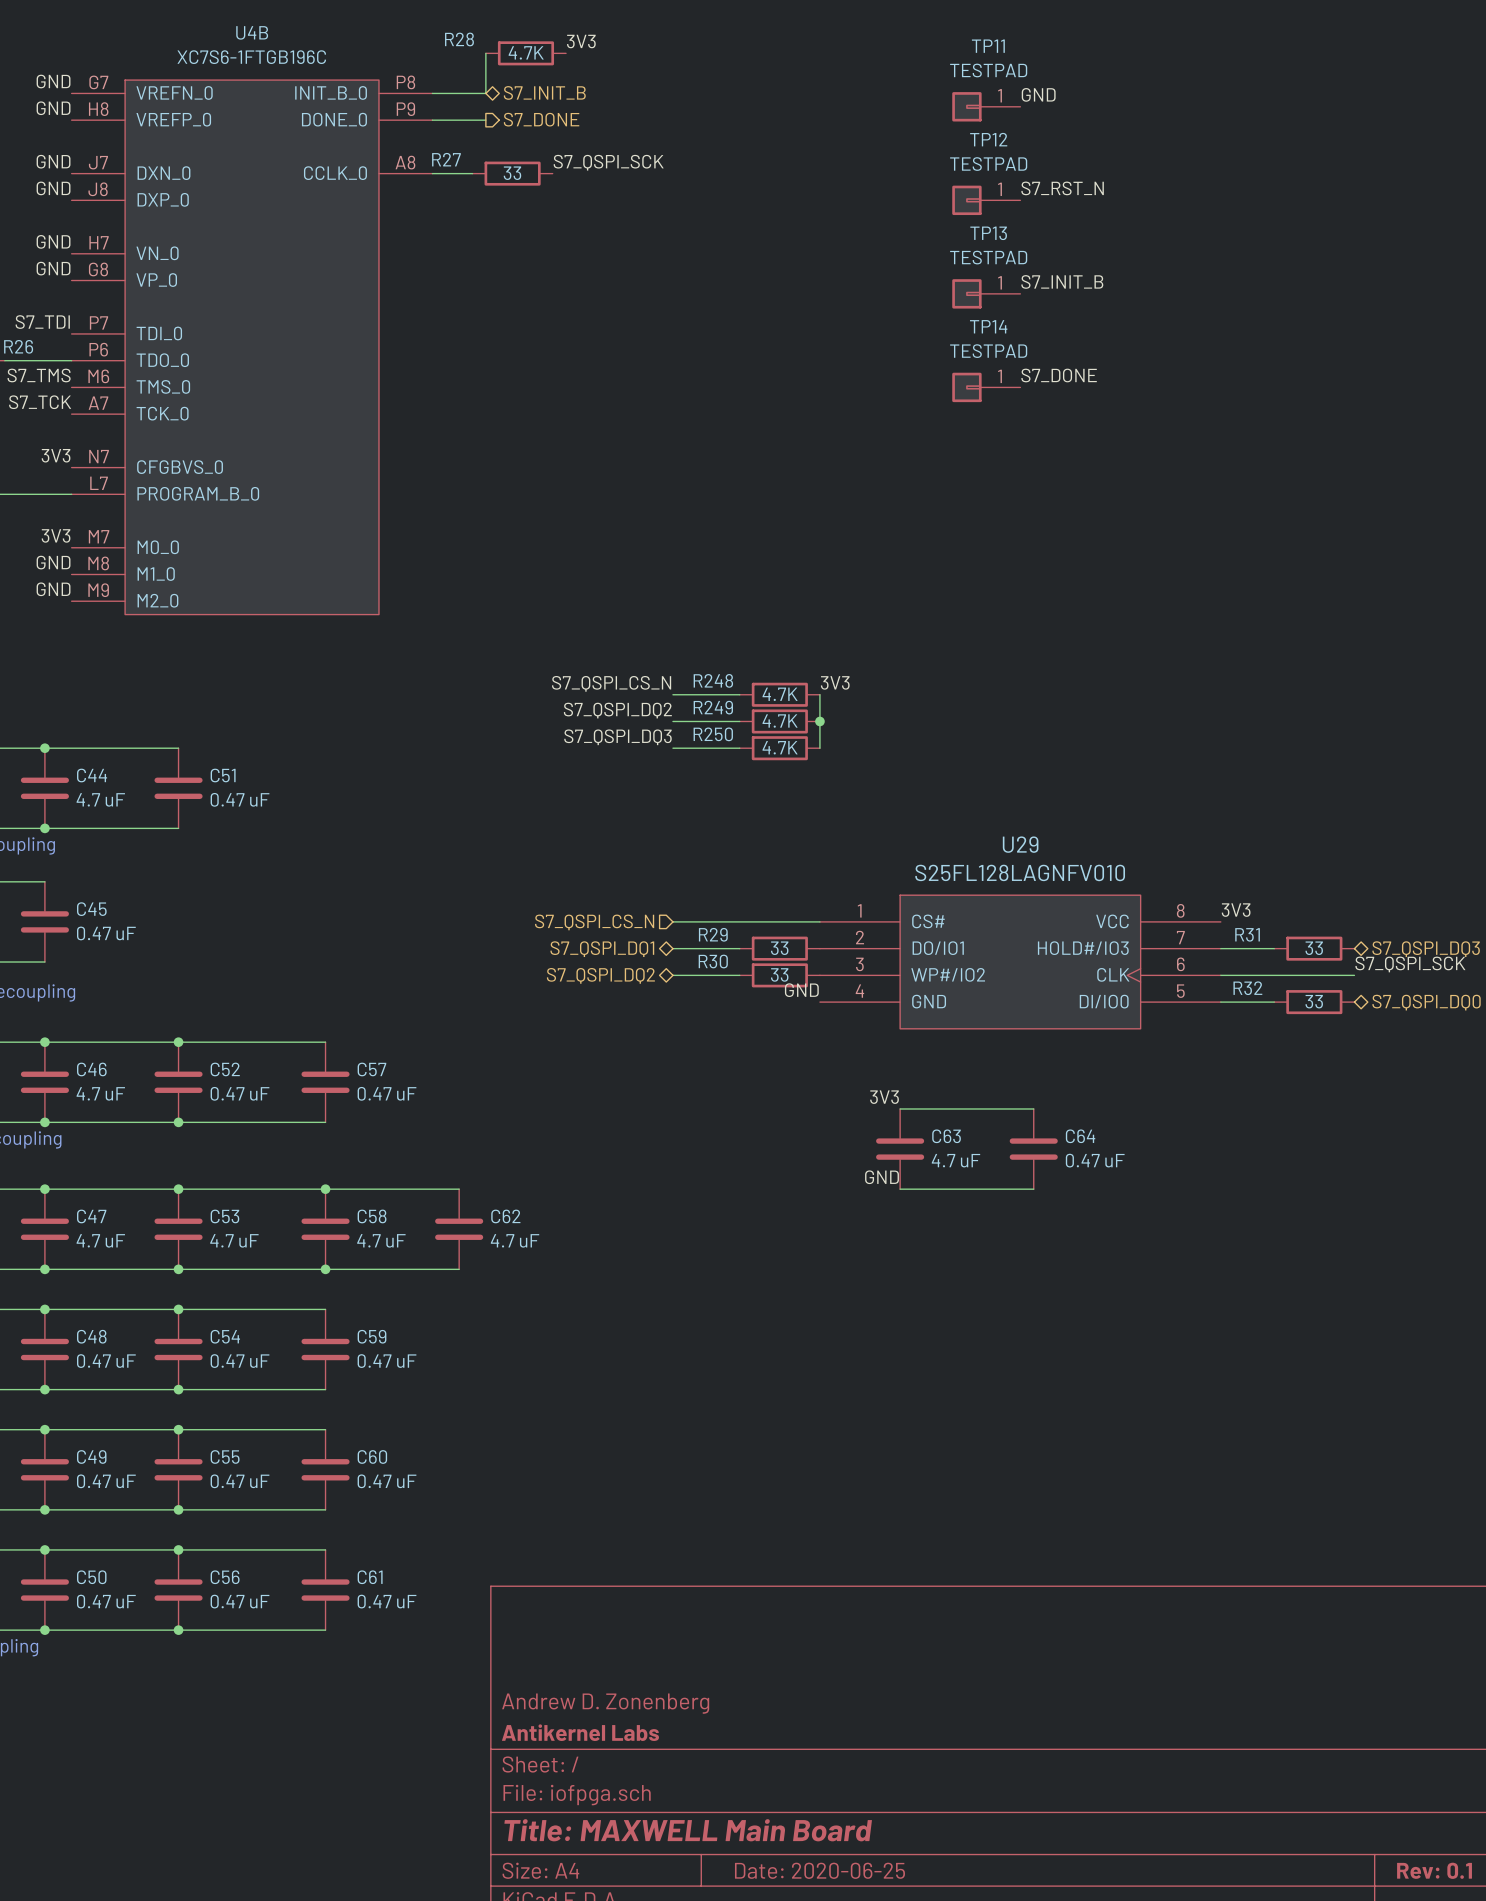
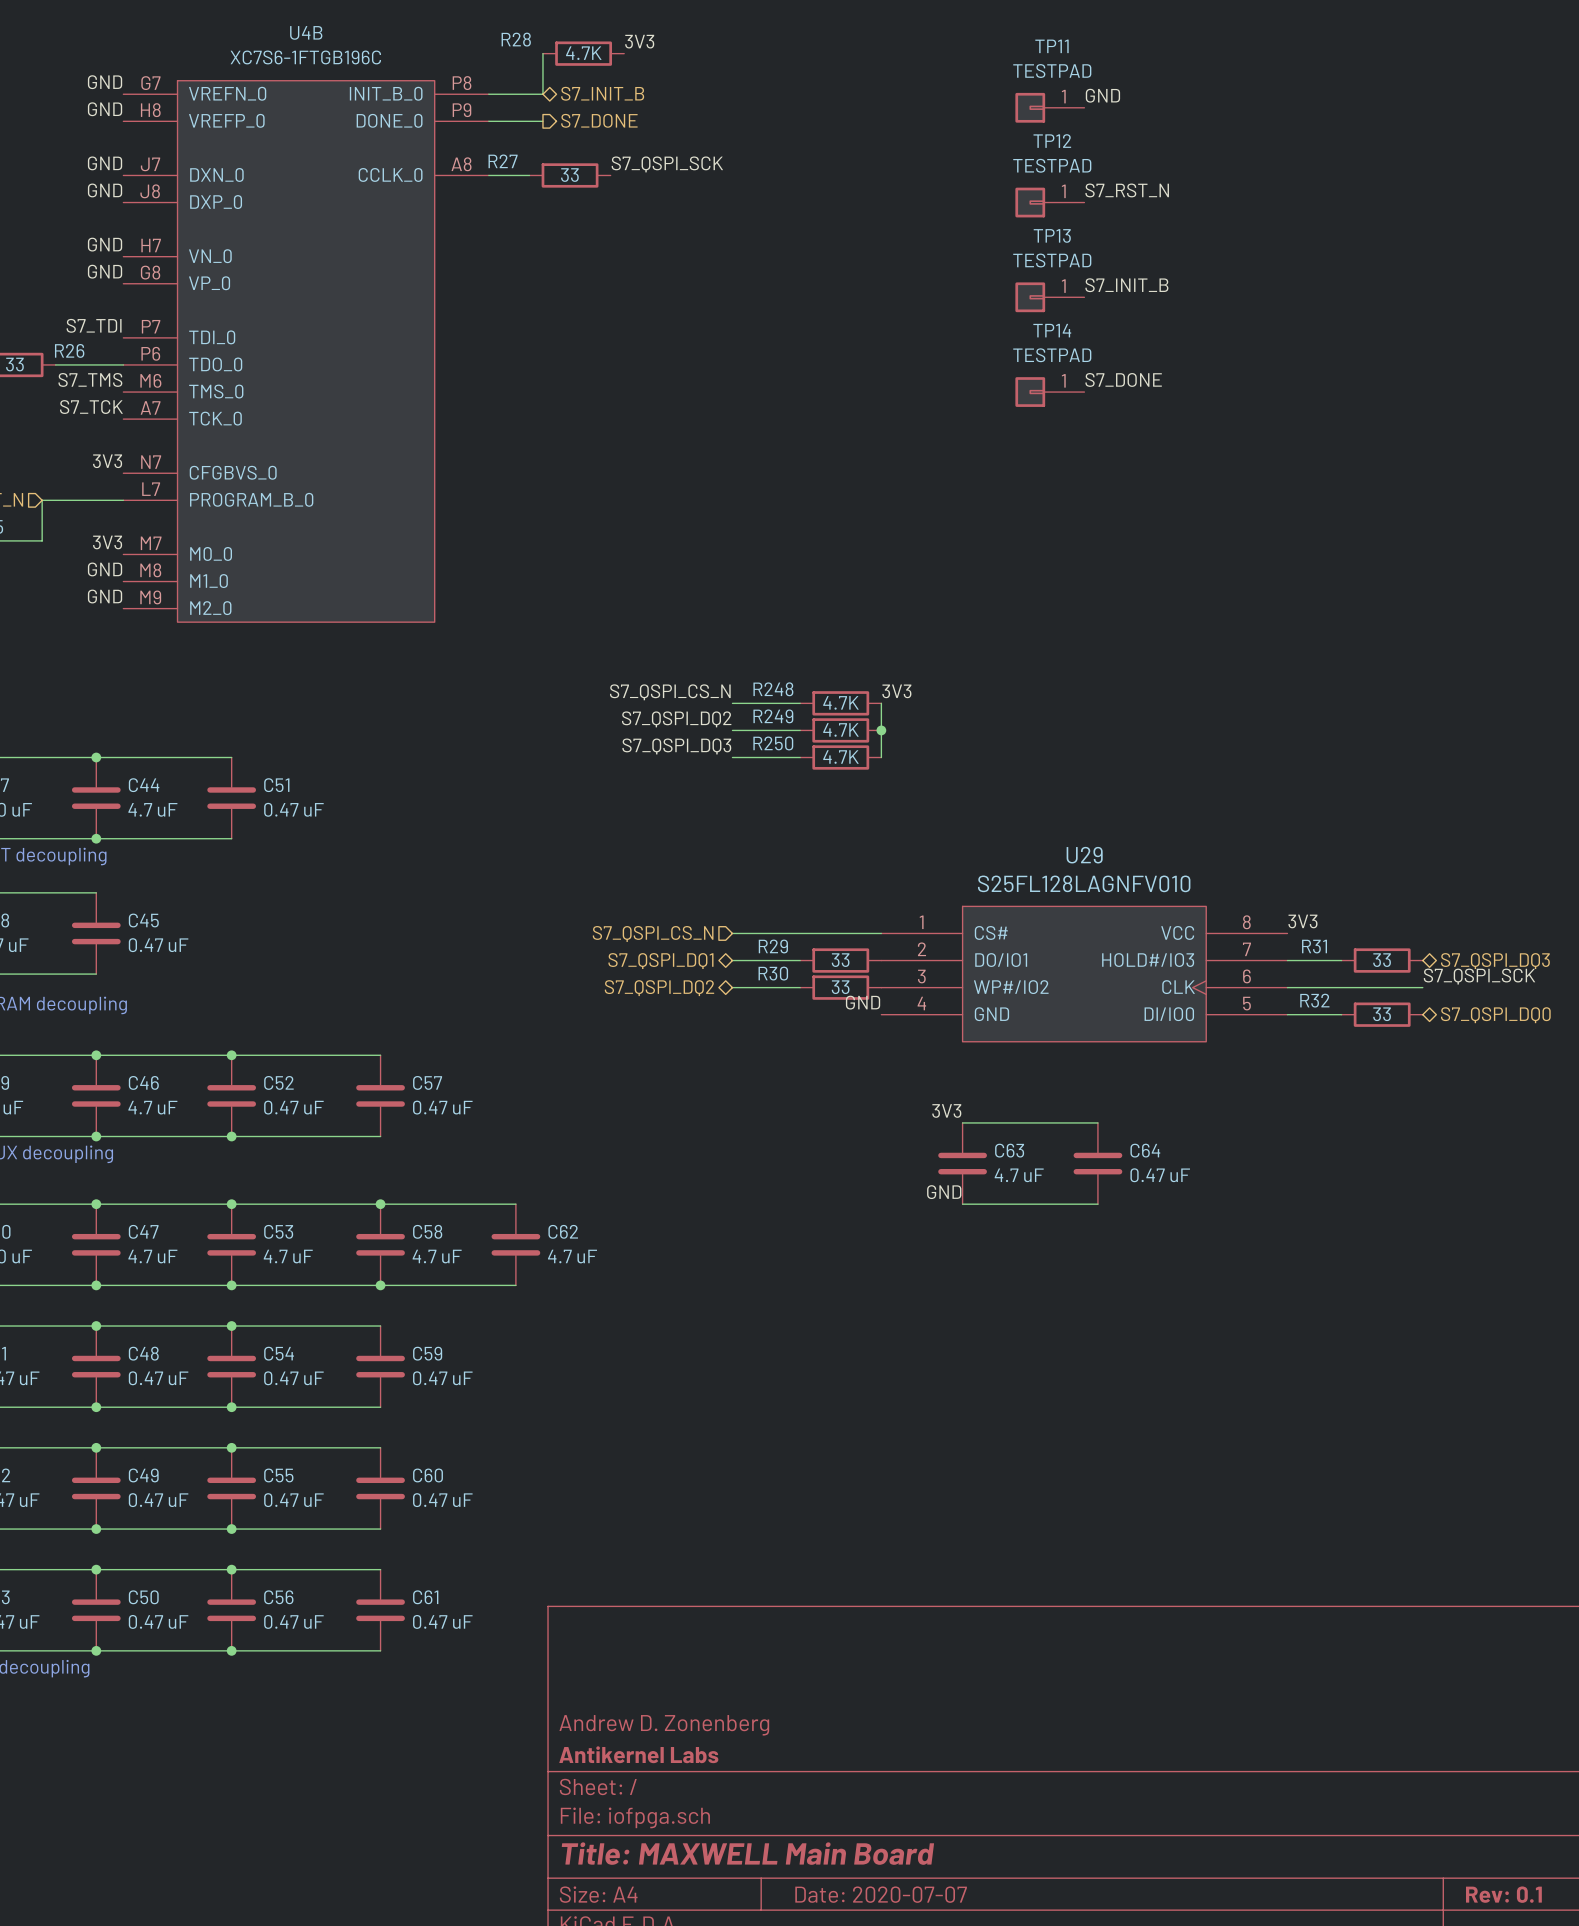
title block: Date: 2020-06-25 (819, 1870) -> Date: 2020-07-07 (881, 1894)

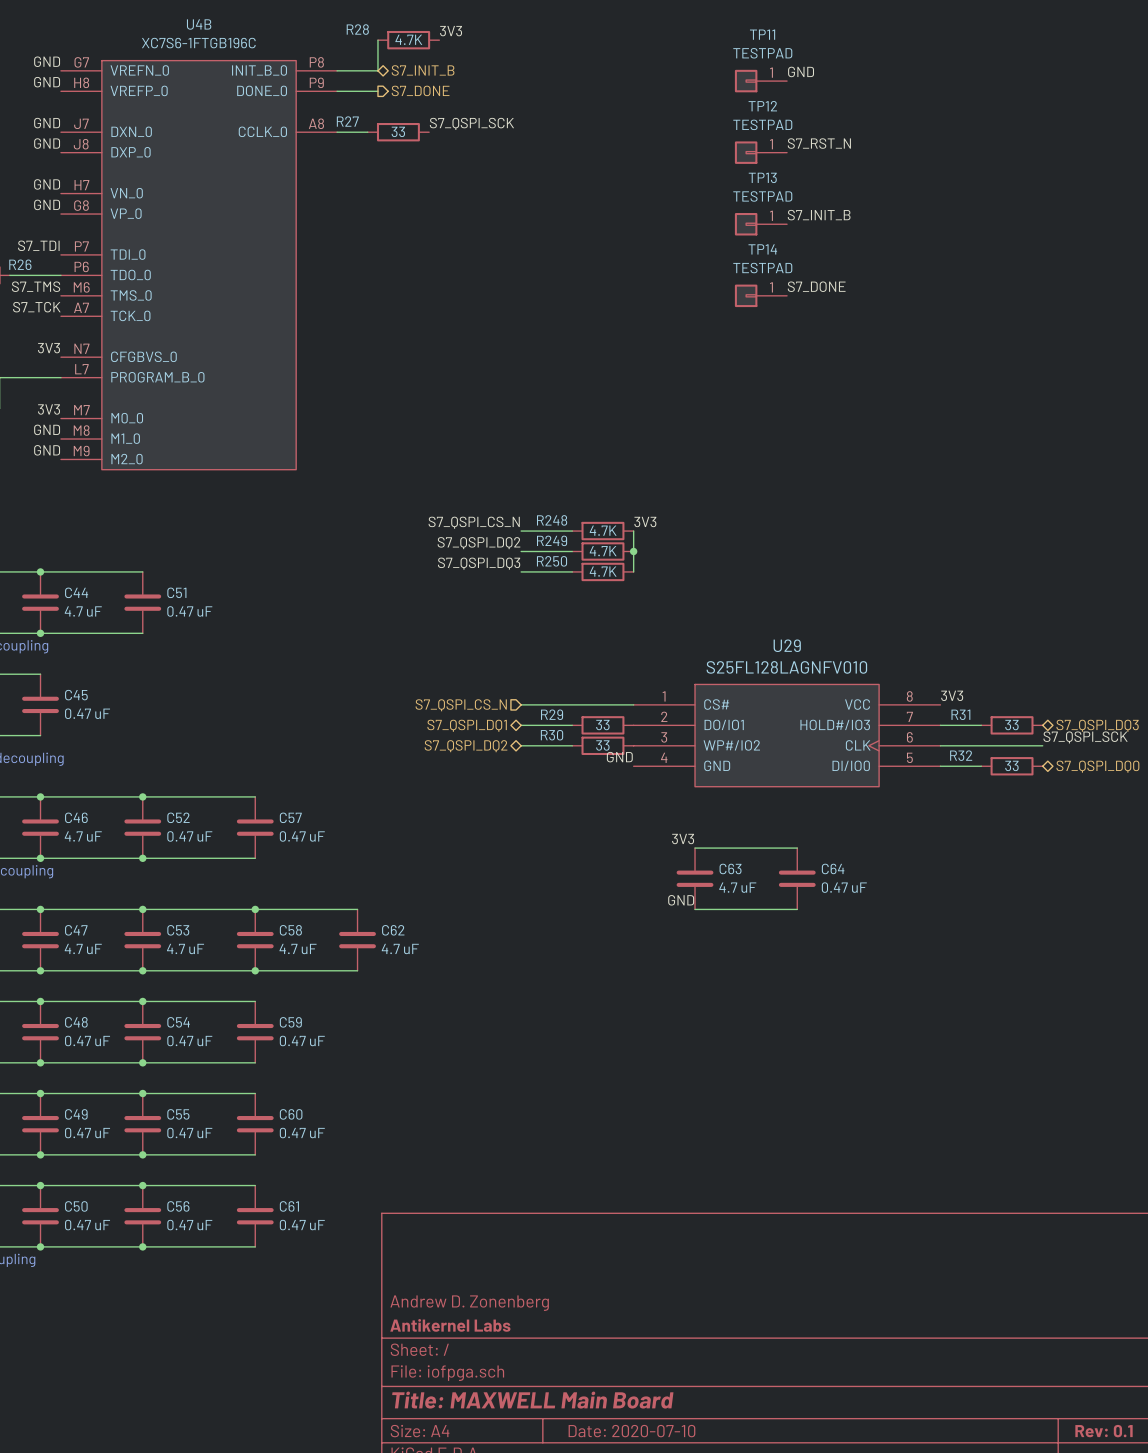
title block: Date: 2020-07-07 (881, 1894) -> Date: 2020-07-10 (631, 1431)

